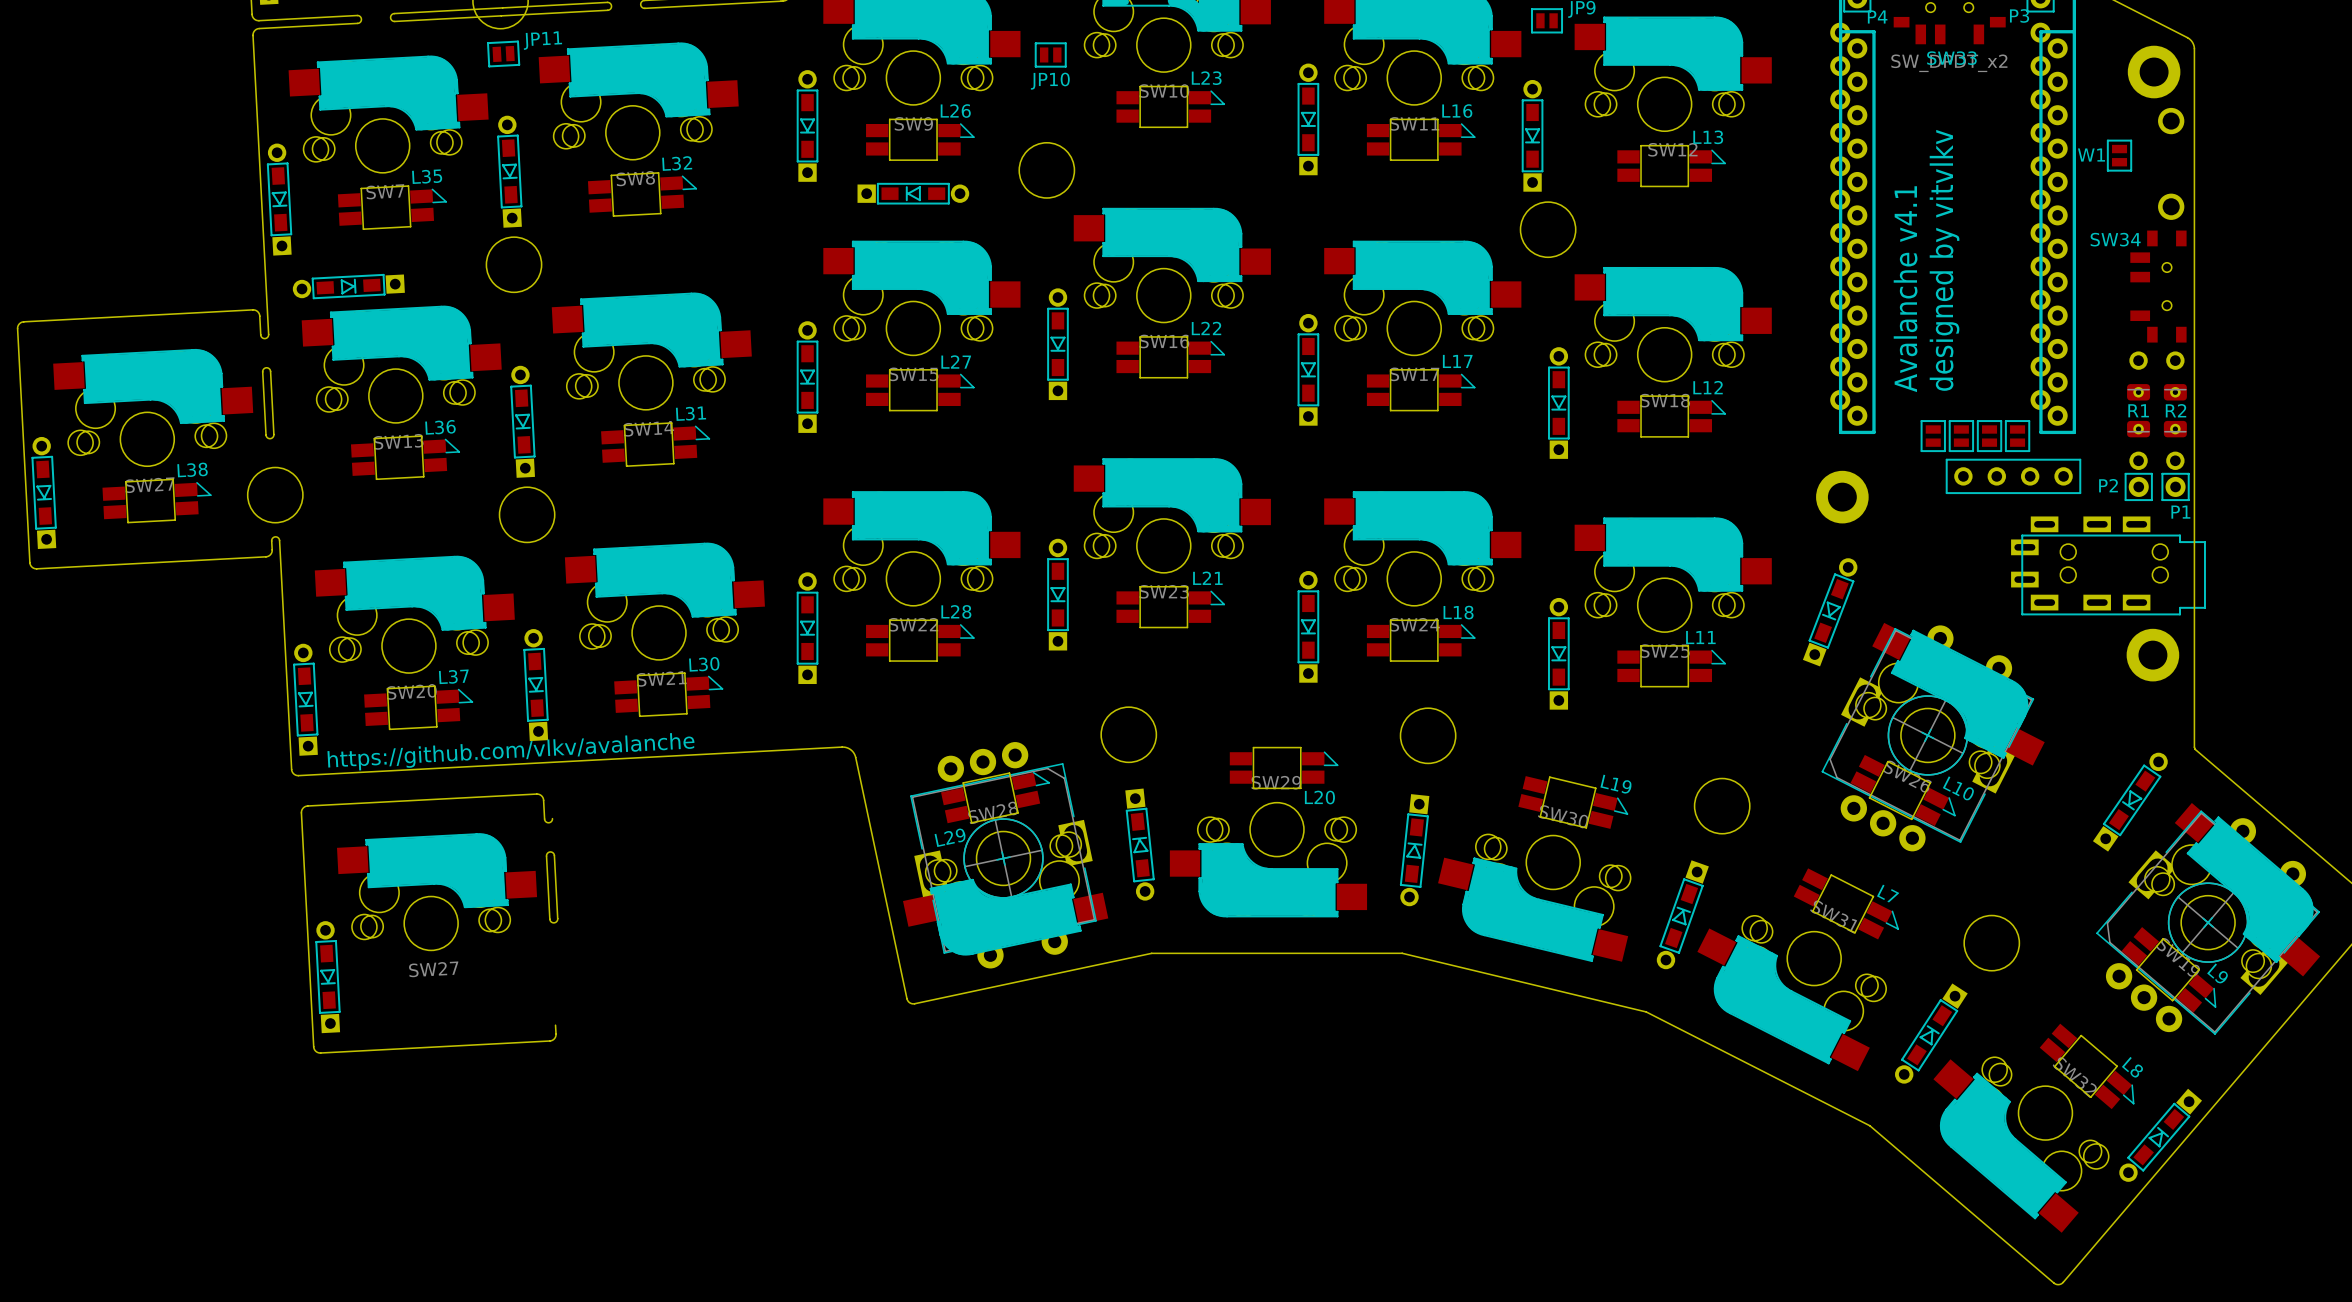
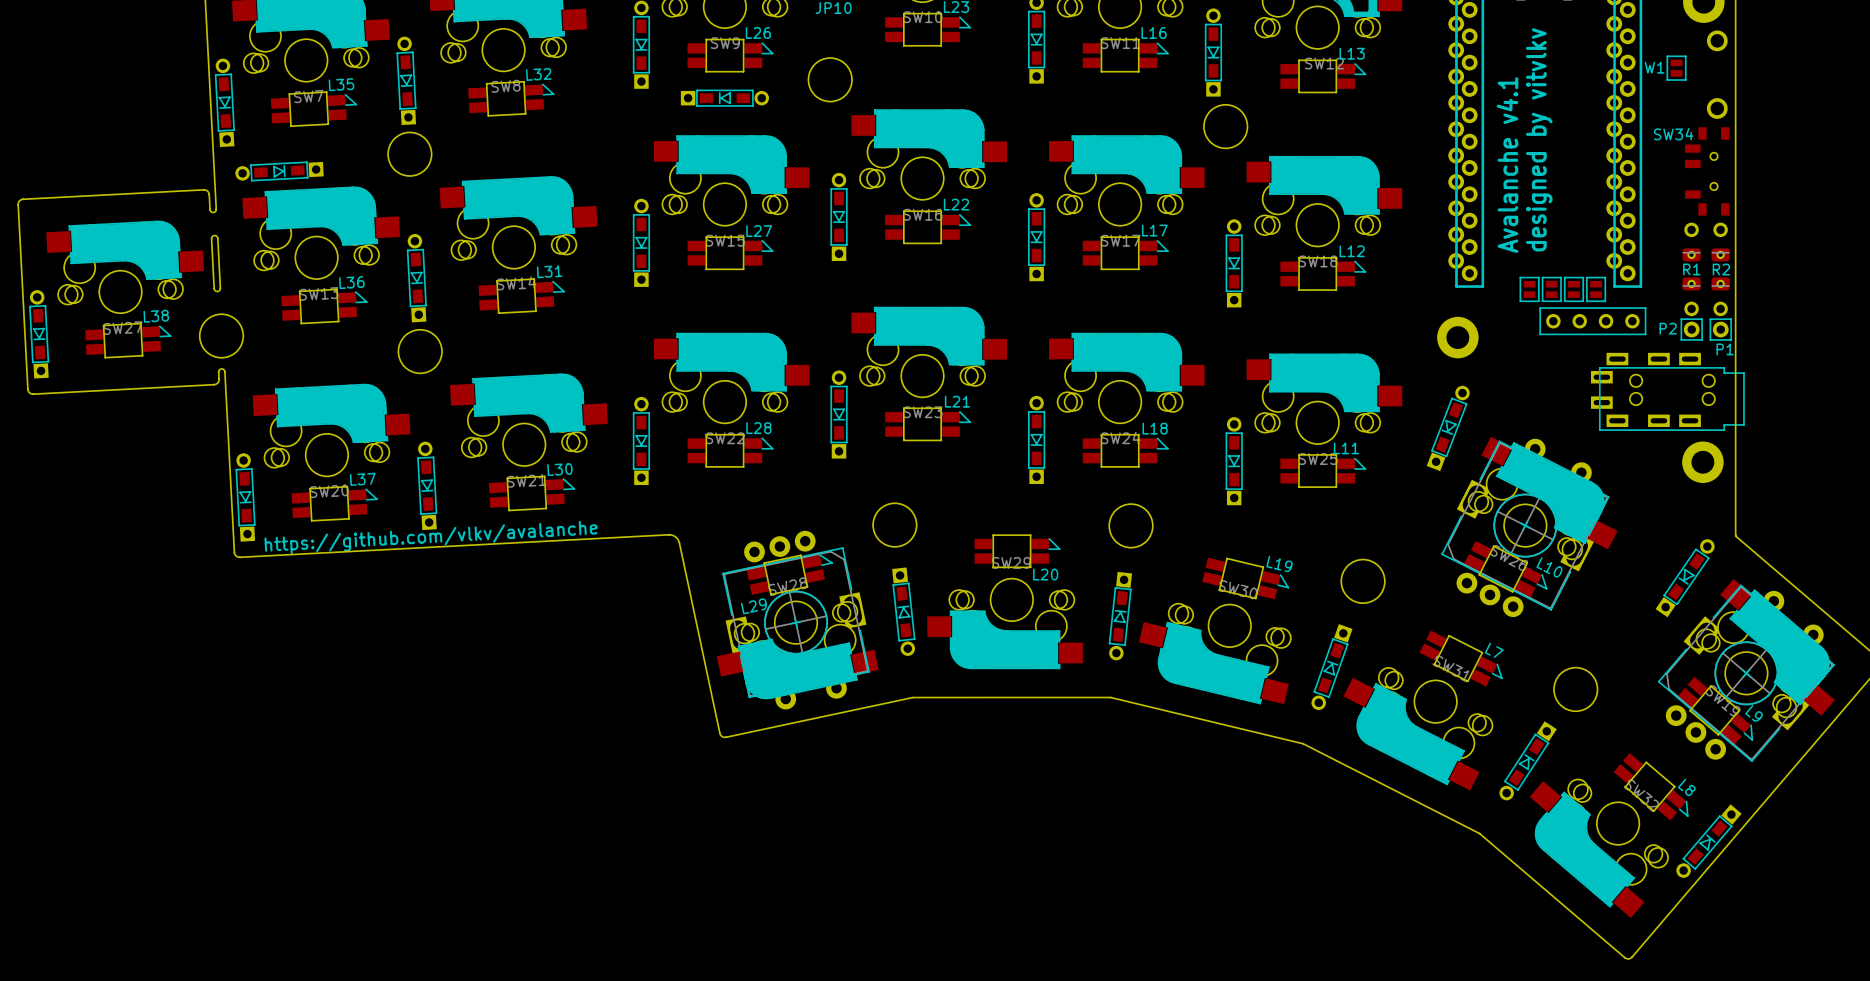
board edge: (552, 818) (549, 822) (545, 820) (543, 798) (537, 794) (307, 806) (303, 807) (301, 812) (313, 1046) (315, 1051) (320, 1053) (549, 1041) (555, 1036) (555, 1025) -> none
board edge: (554, 855) (557, 919) (553, 922) (549, 919) (546, 855) (550, 851) (554, 855) -> none
SW27: (437, 891) -> none
part: (327, 977) -> none

